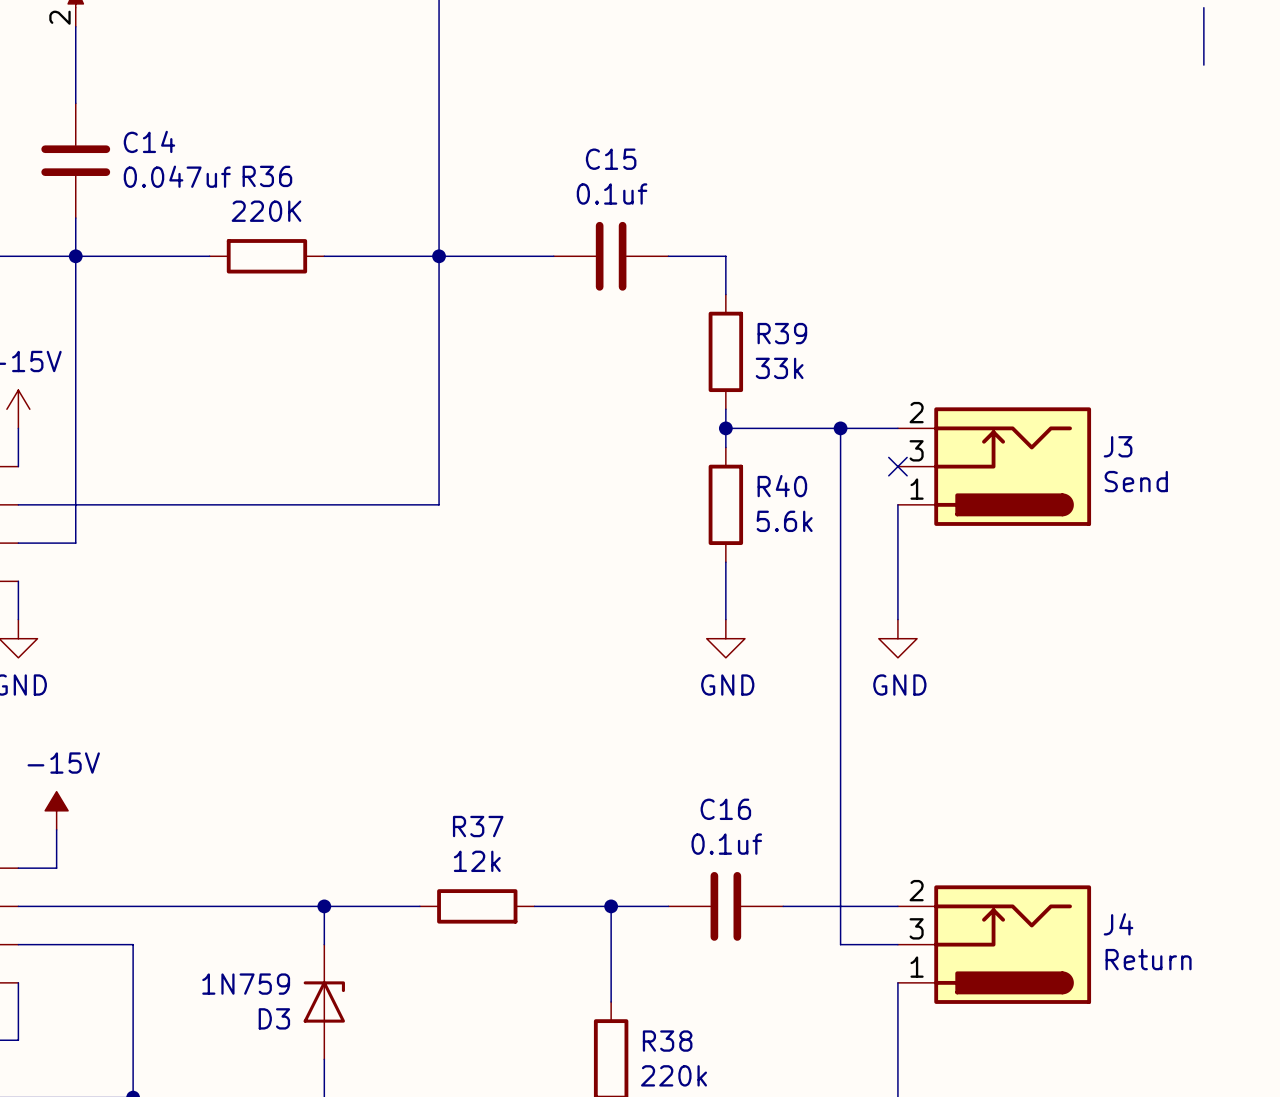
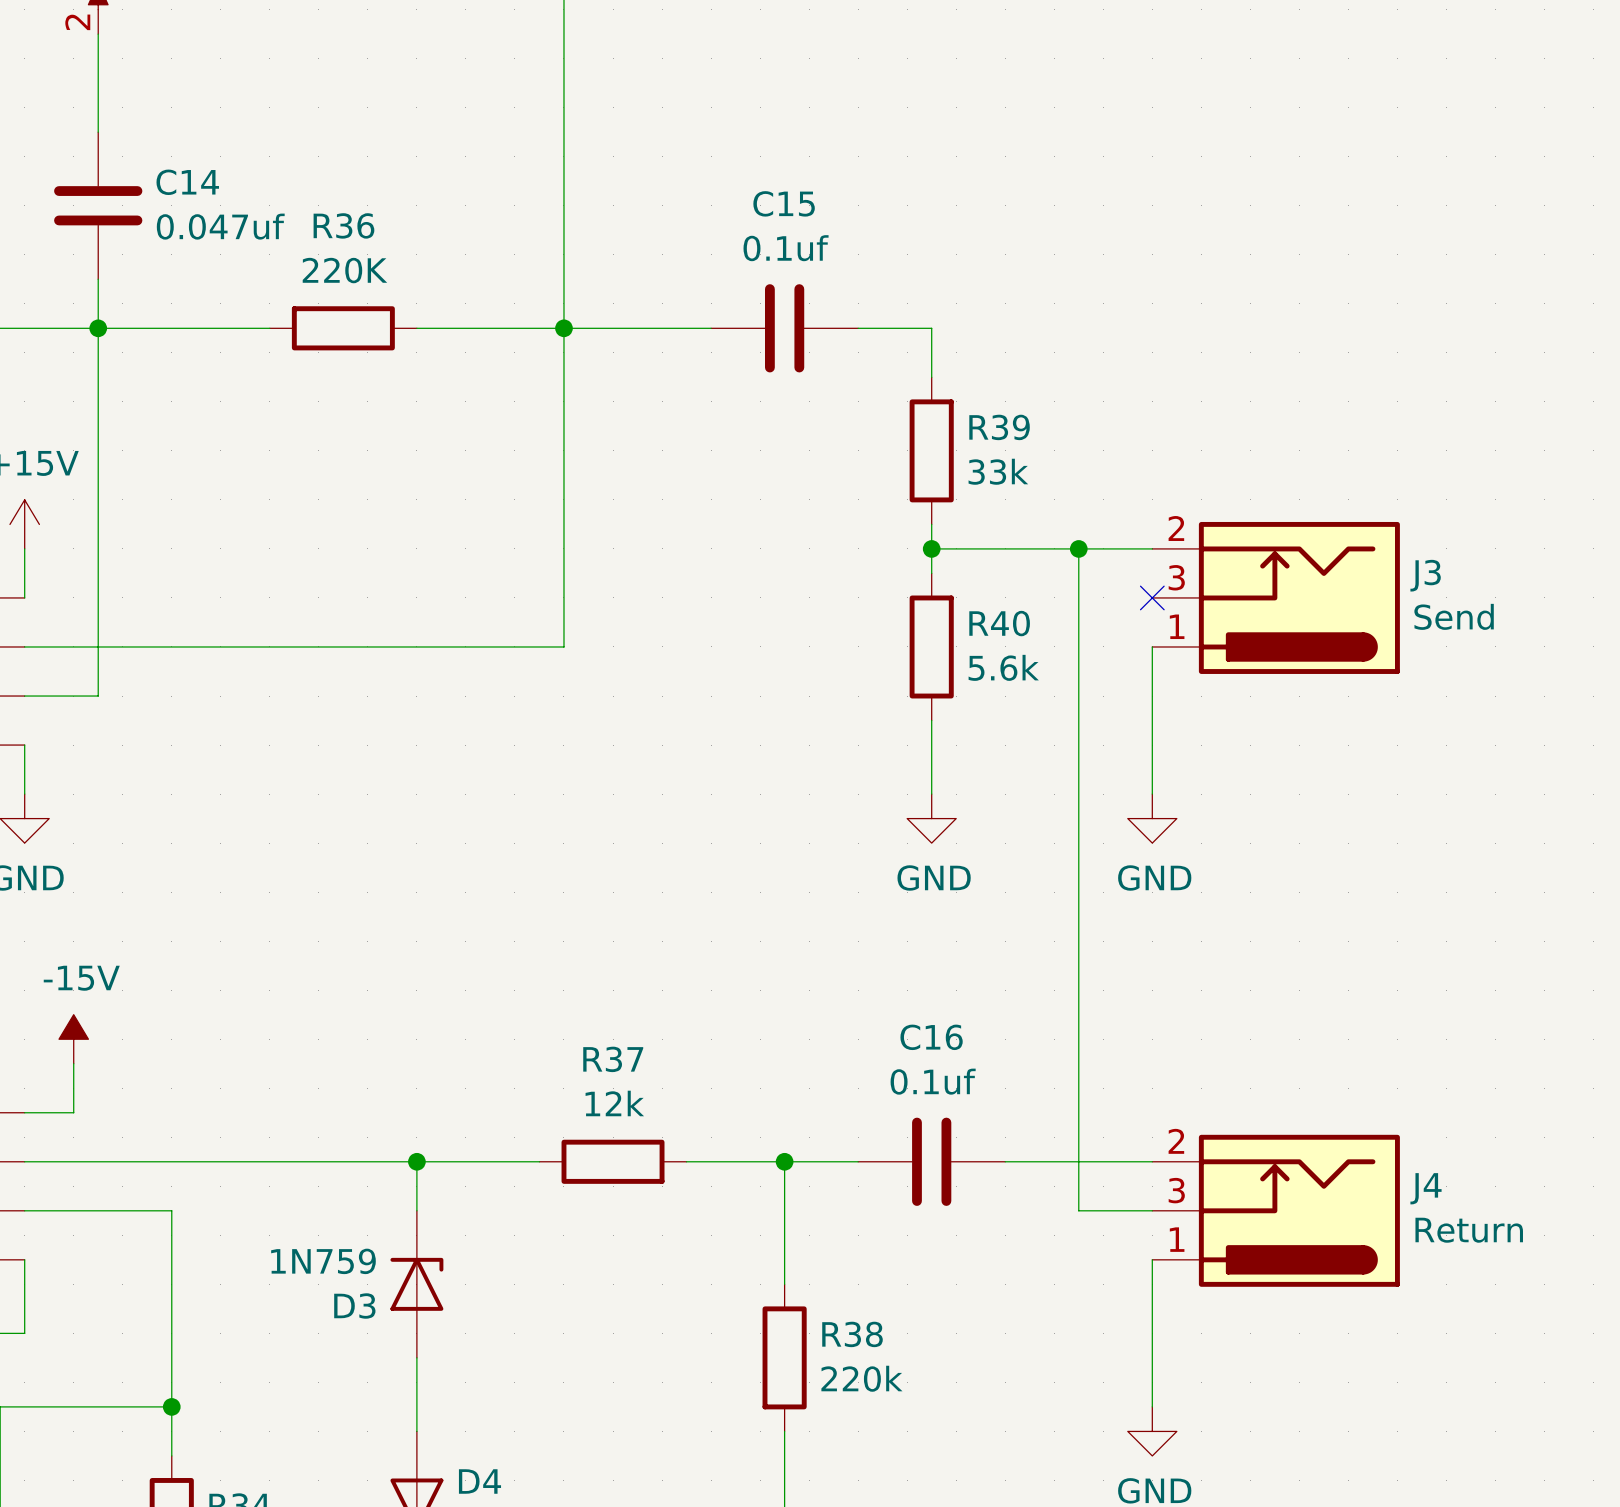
wire: (1203, 7) (1203, 65) -> none

